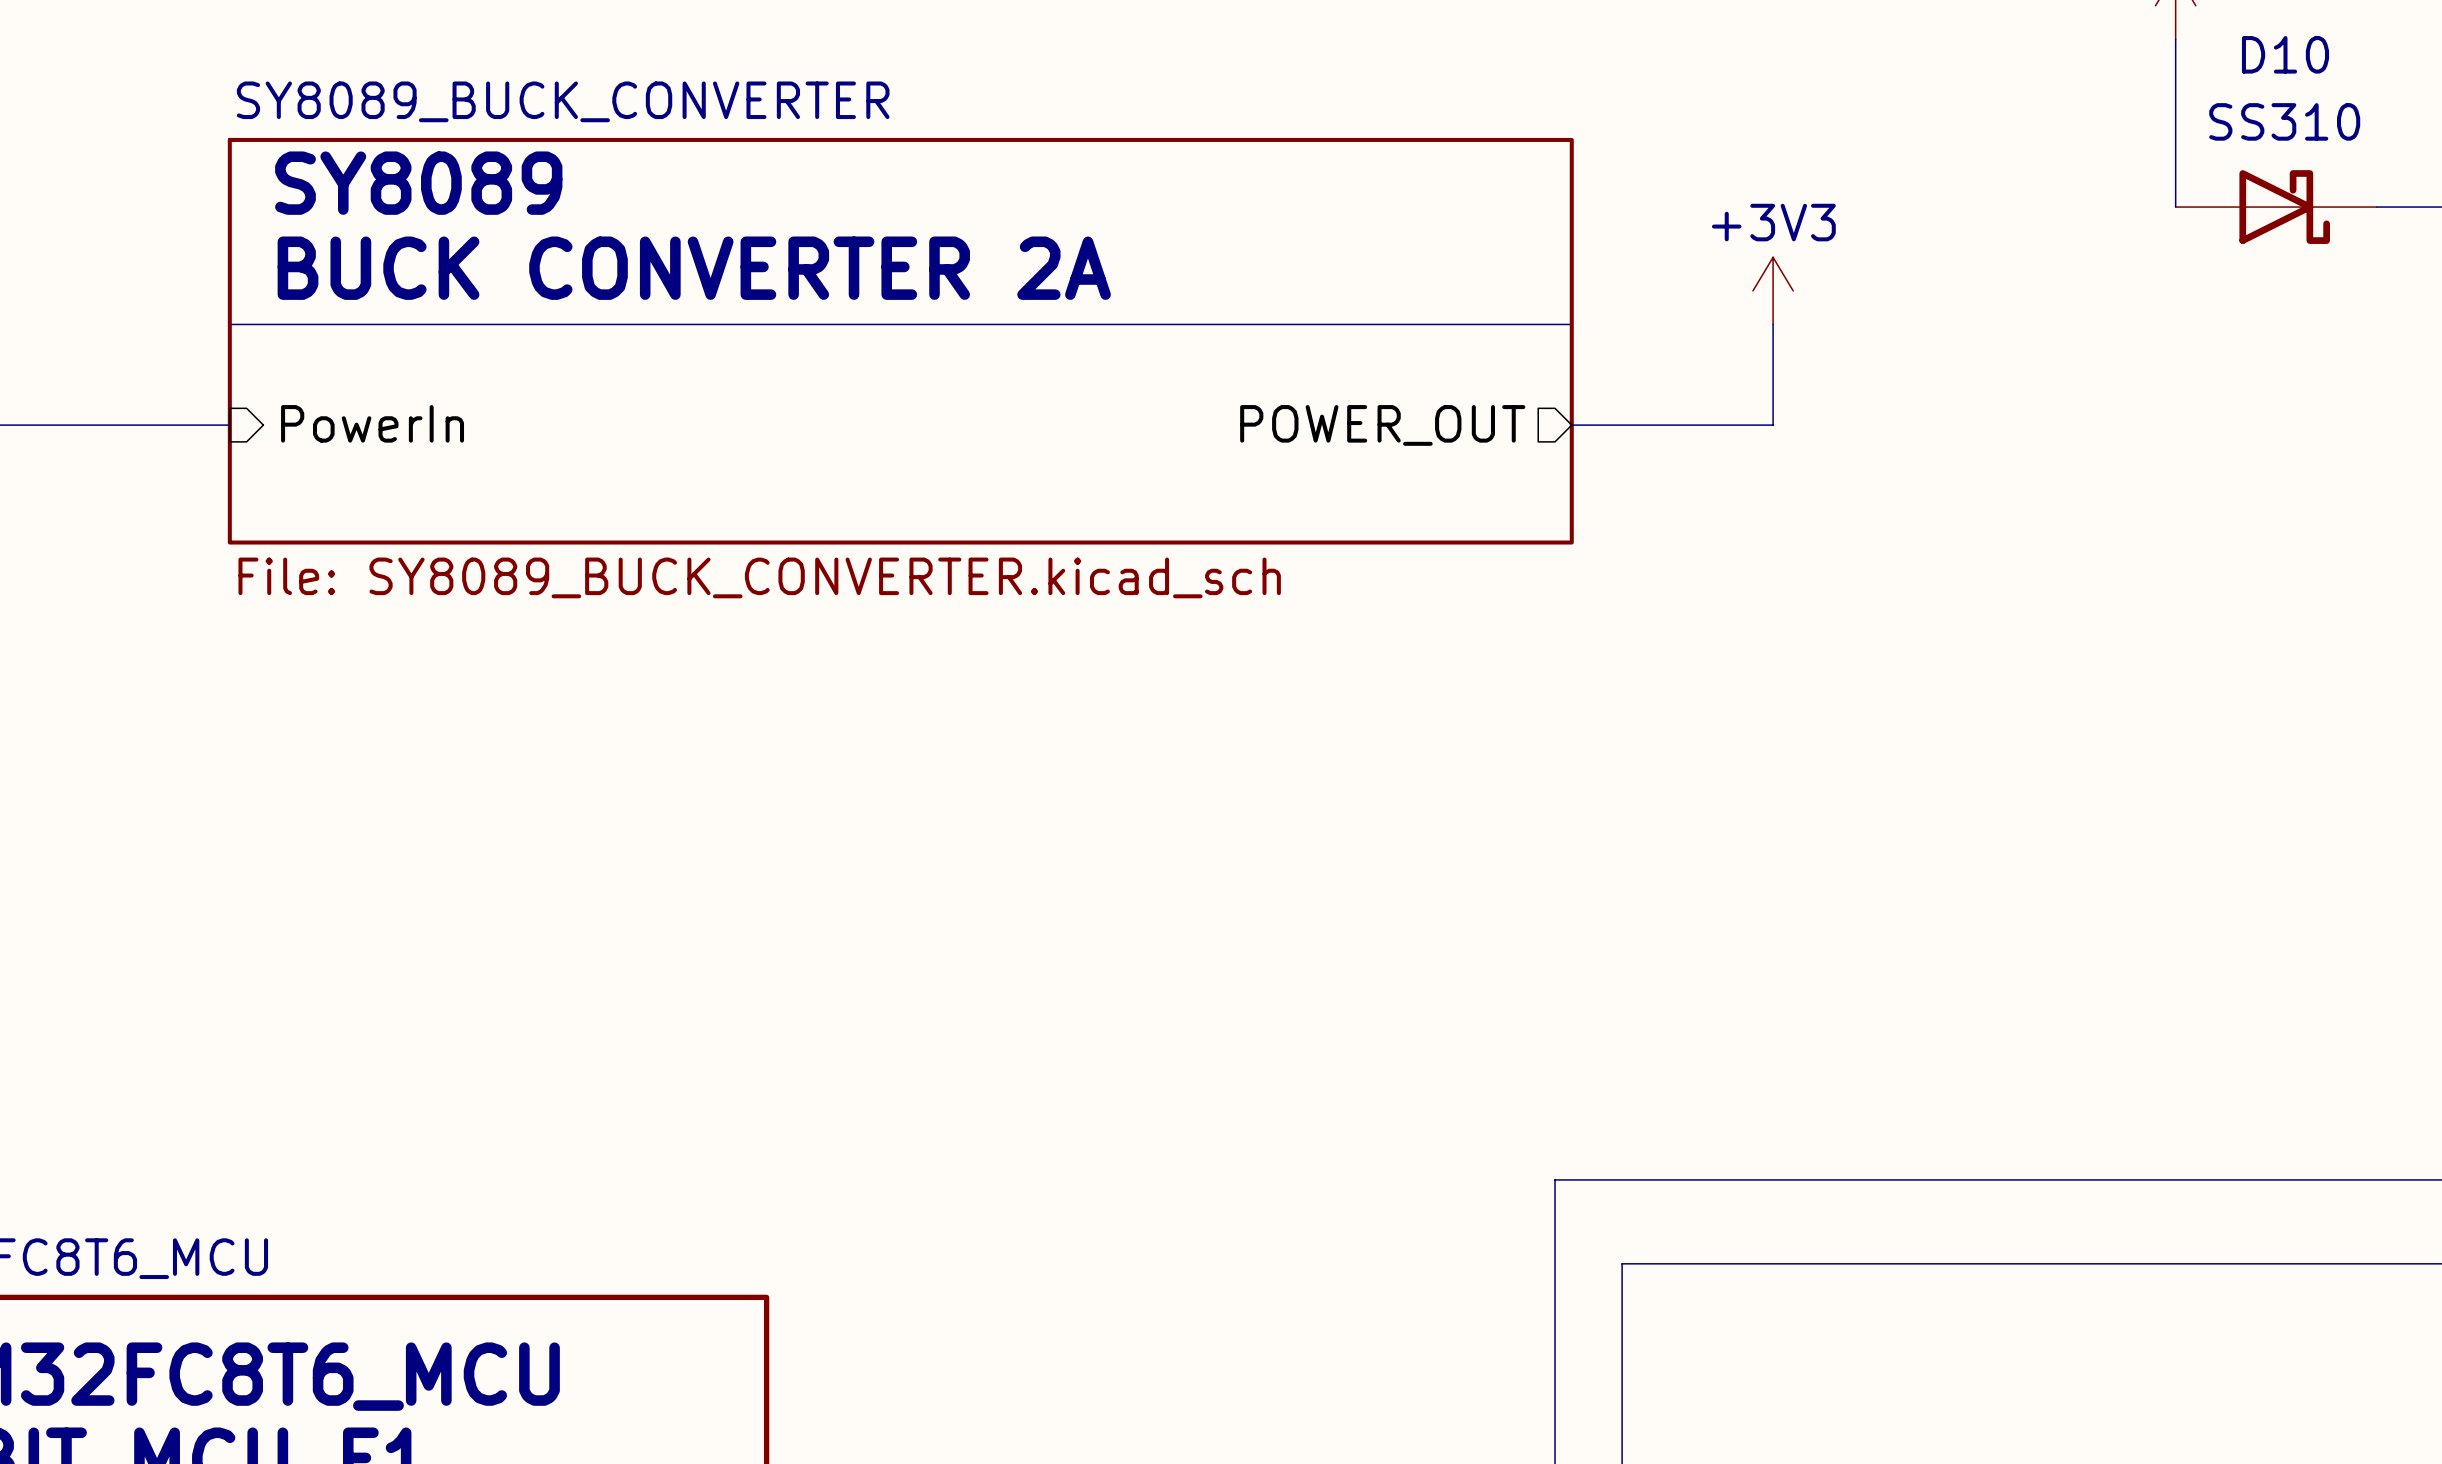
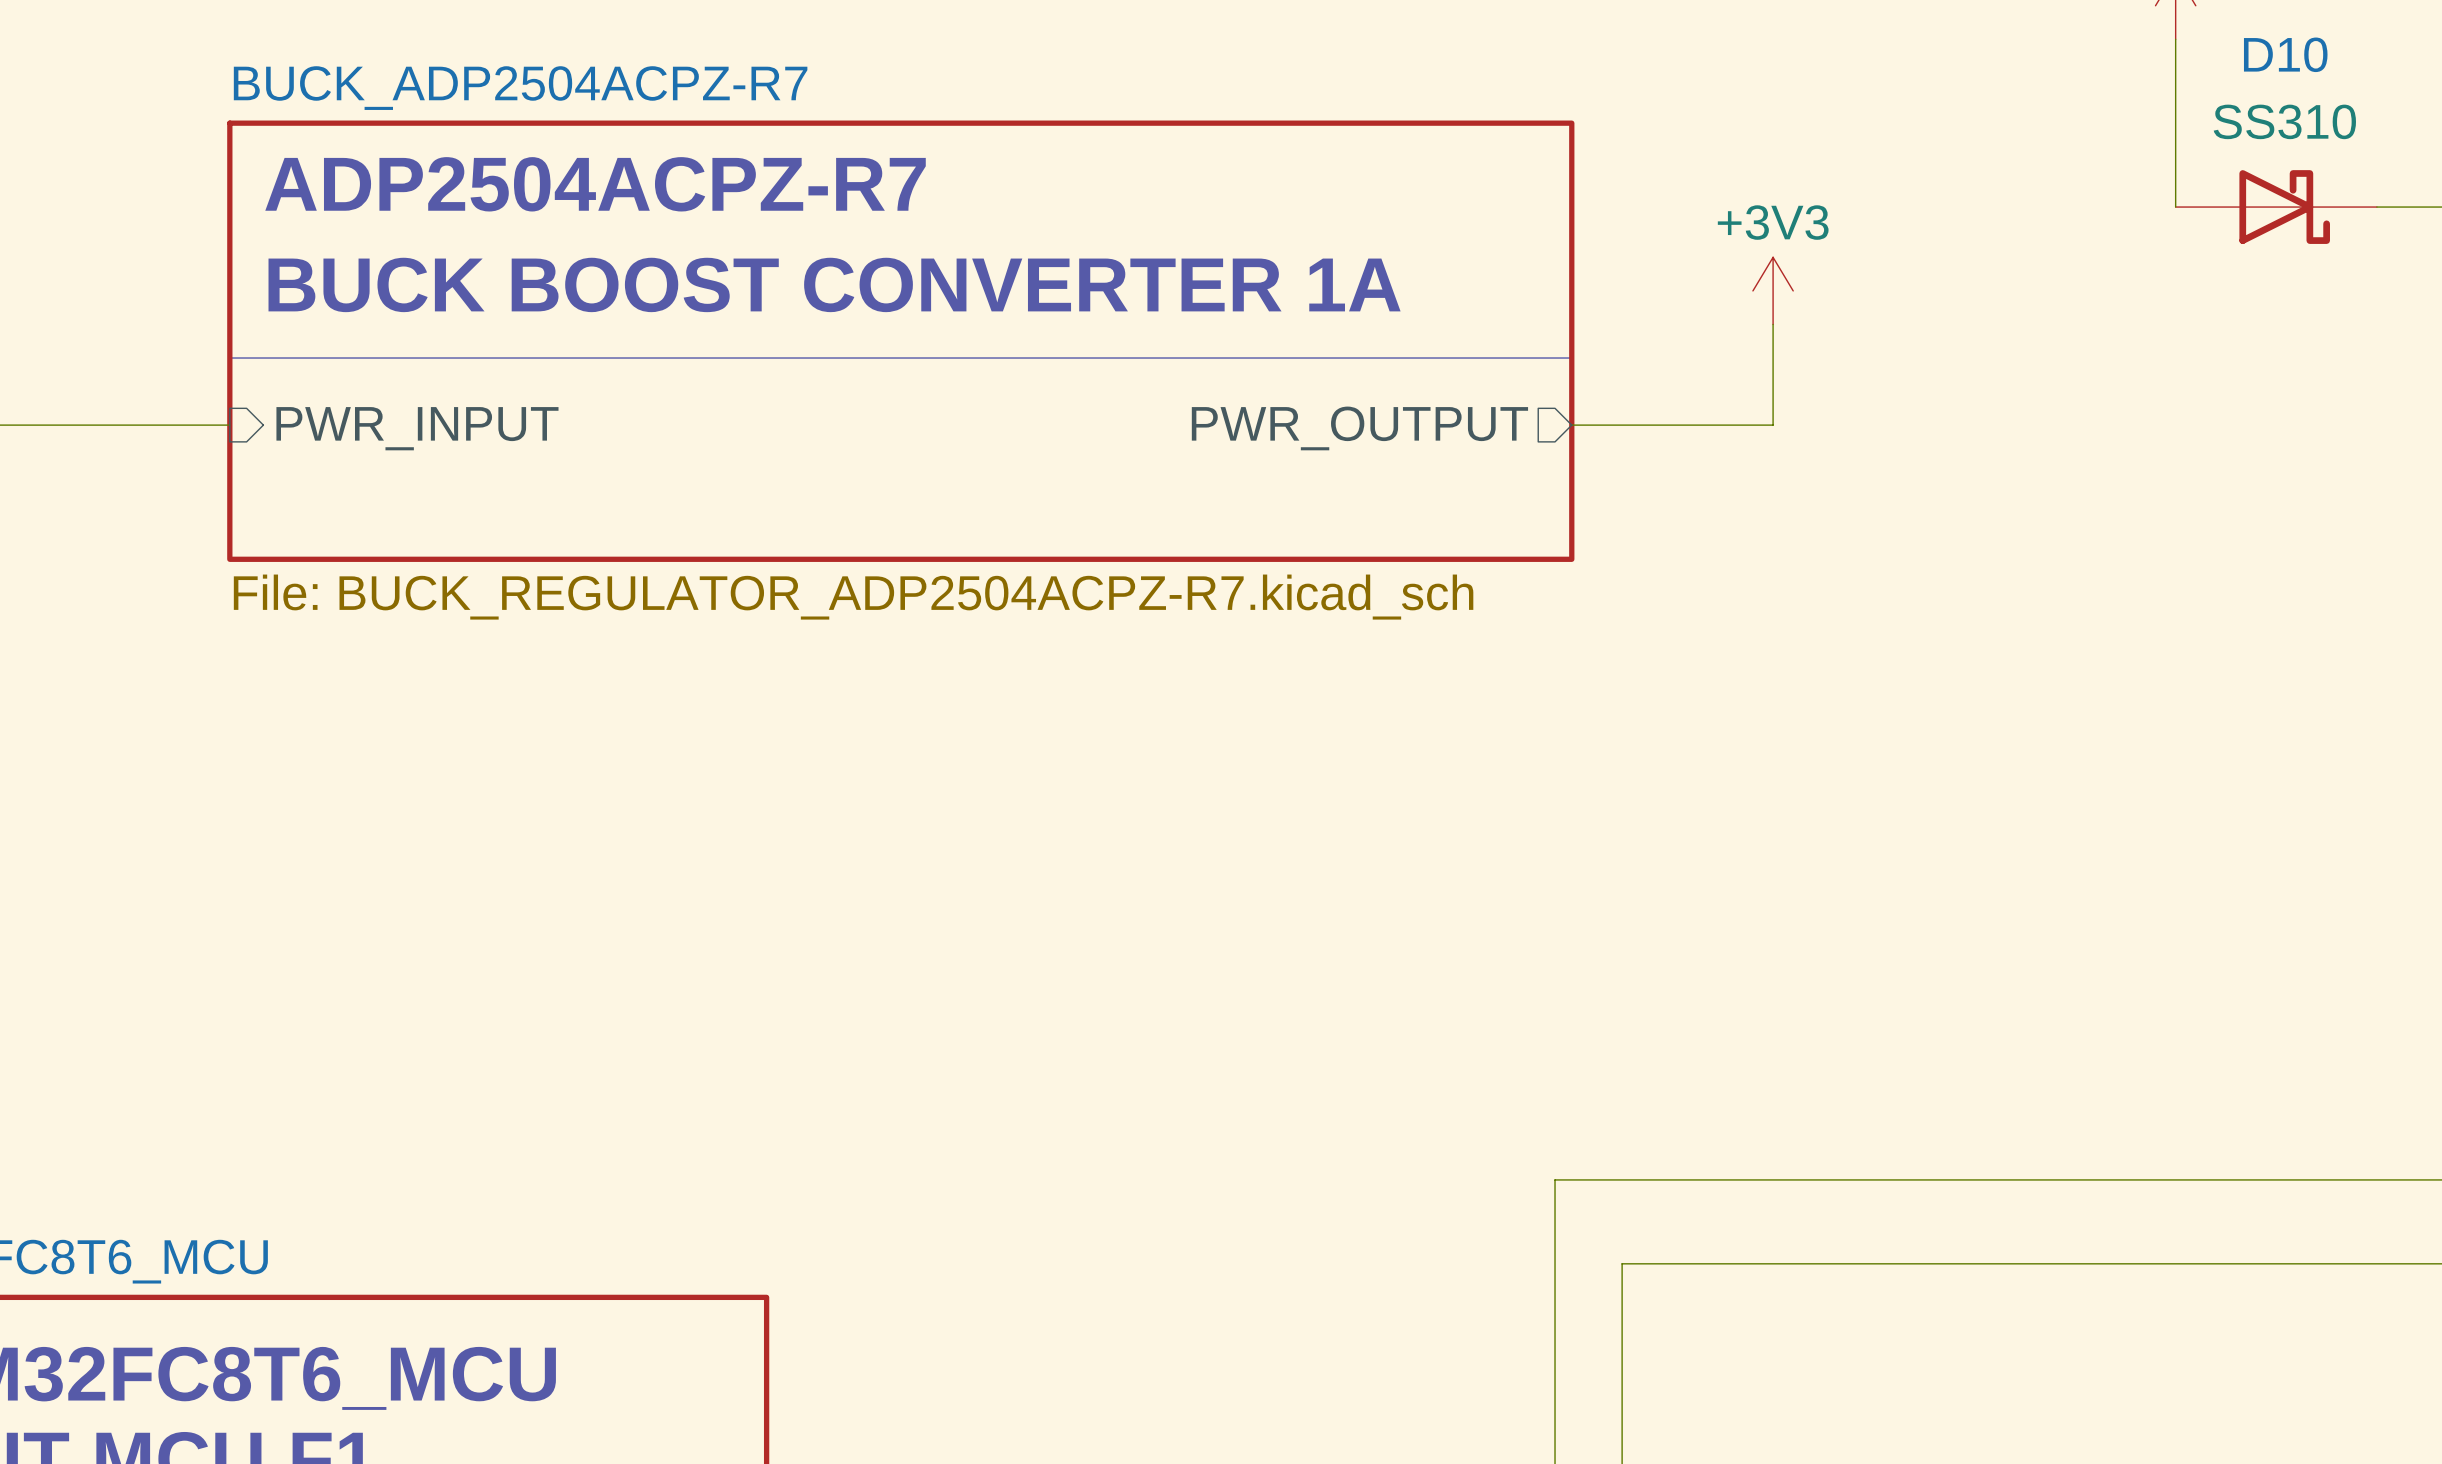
text: SY8089 (418, 183) -> ADP2504ACPZ-R7 (595, 184)
text: BUCK CONVERTER 2A (694, 268) -> BUCK BOOST CONVERTER 1A (834, 284)
line: (229, 324) (1571, 324) -> (229, 358) (1571, 358)
sheet SY8089_BUCK_CONVERTER: File: SY8089_BUCK_CONVERTER.kicad_sch (900, 341) -> none
sheet BUCK_ADP2504ACPZ-R7: none -> File: BUCK_REGULATOR_ADP2504ACPZ-R7.kicad_sch (900, 341)
sheet pin: PowerIn (372, 423) -> PWR_INPUT (417, 428)
sheet pin: POWER_OUT (1382, 425) -> PWR_OUTPUT (1359, 428)

